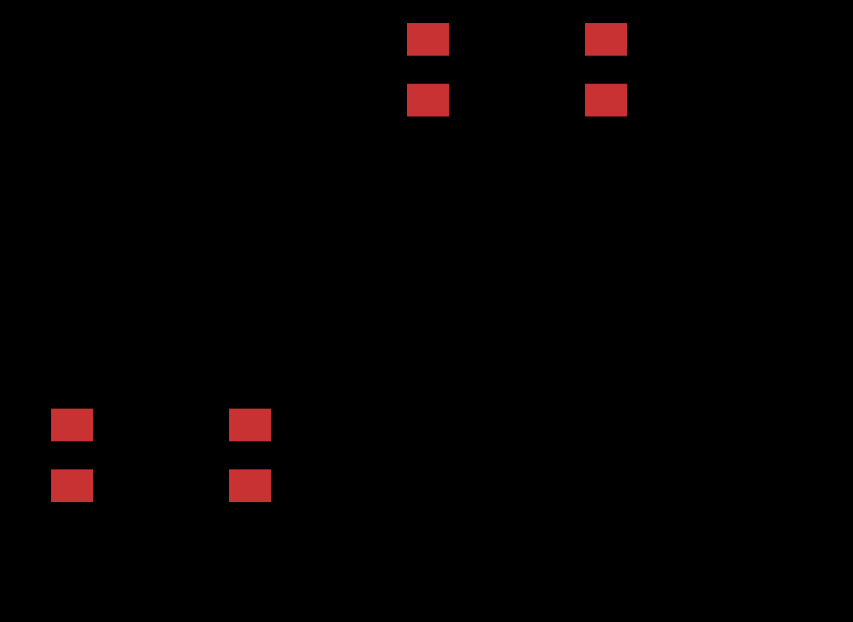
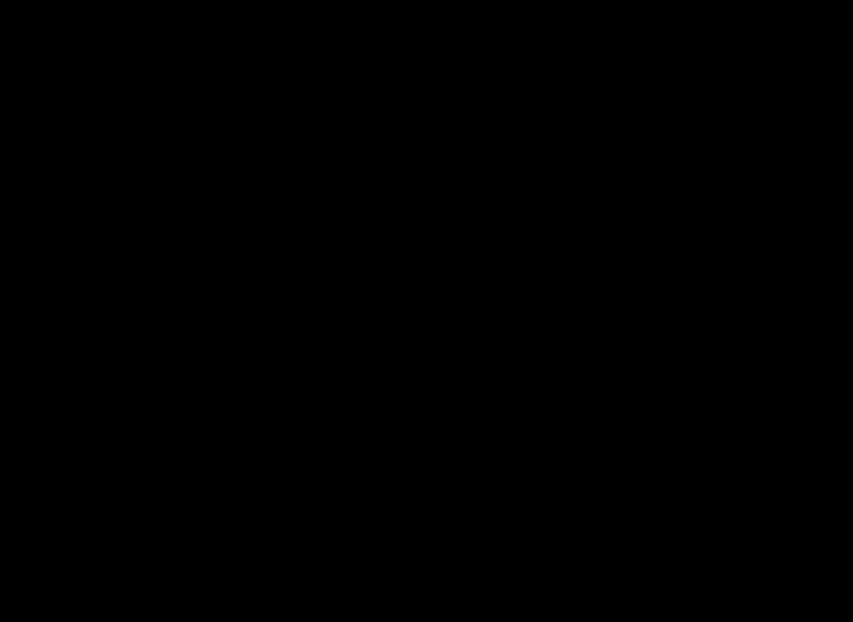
part: (428, 69) -> none
part: (605, 69) -> none
part: (72, 455) -> none
part: (250, 455) -> none

